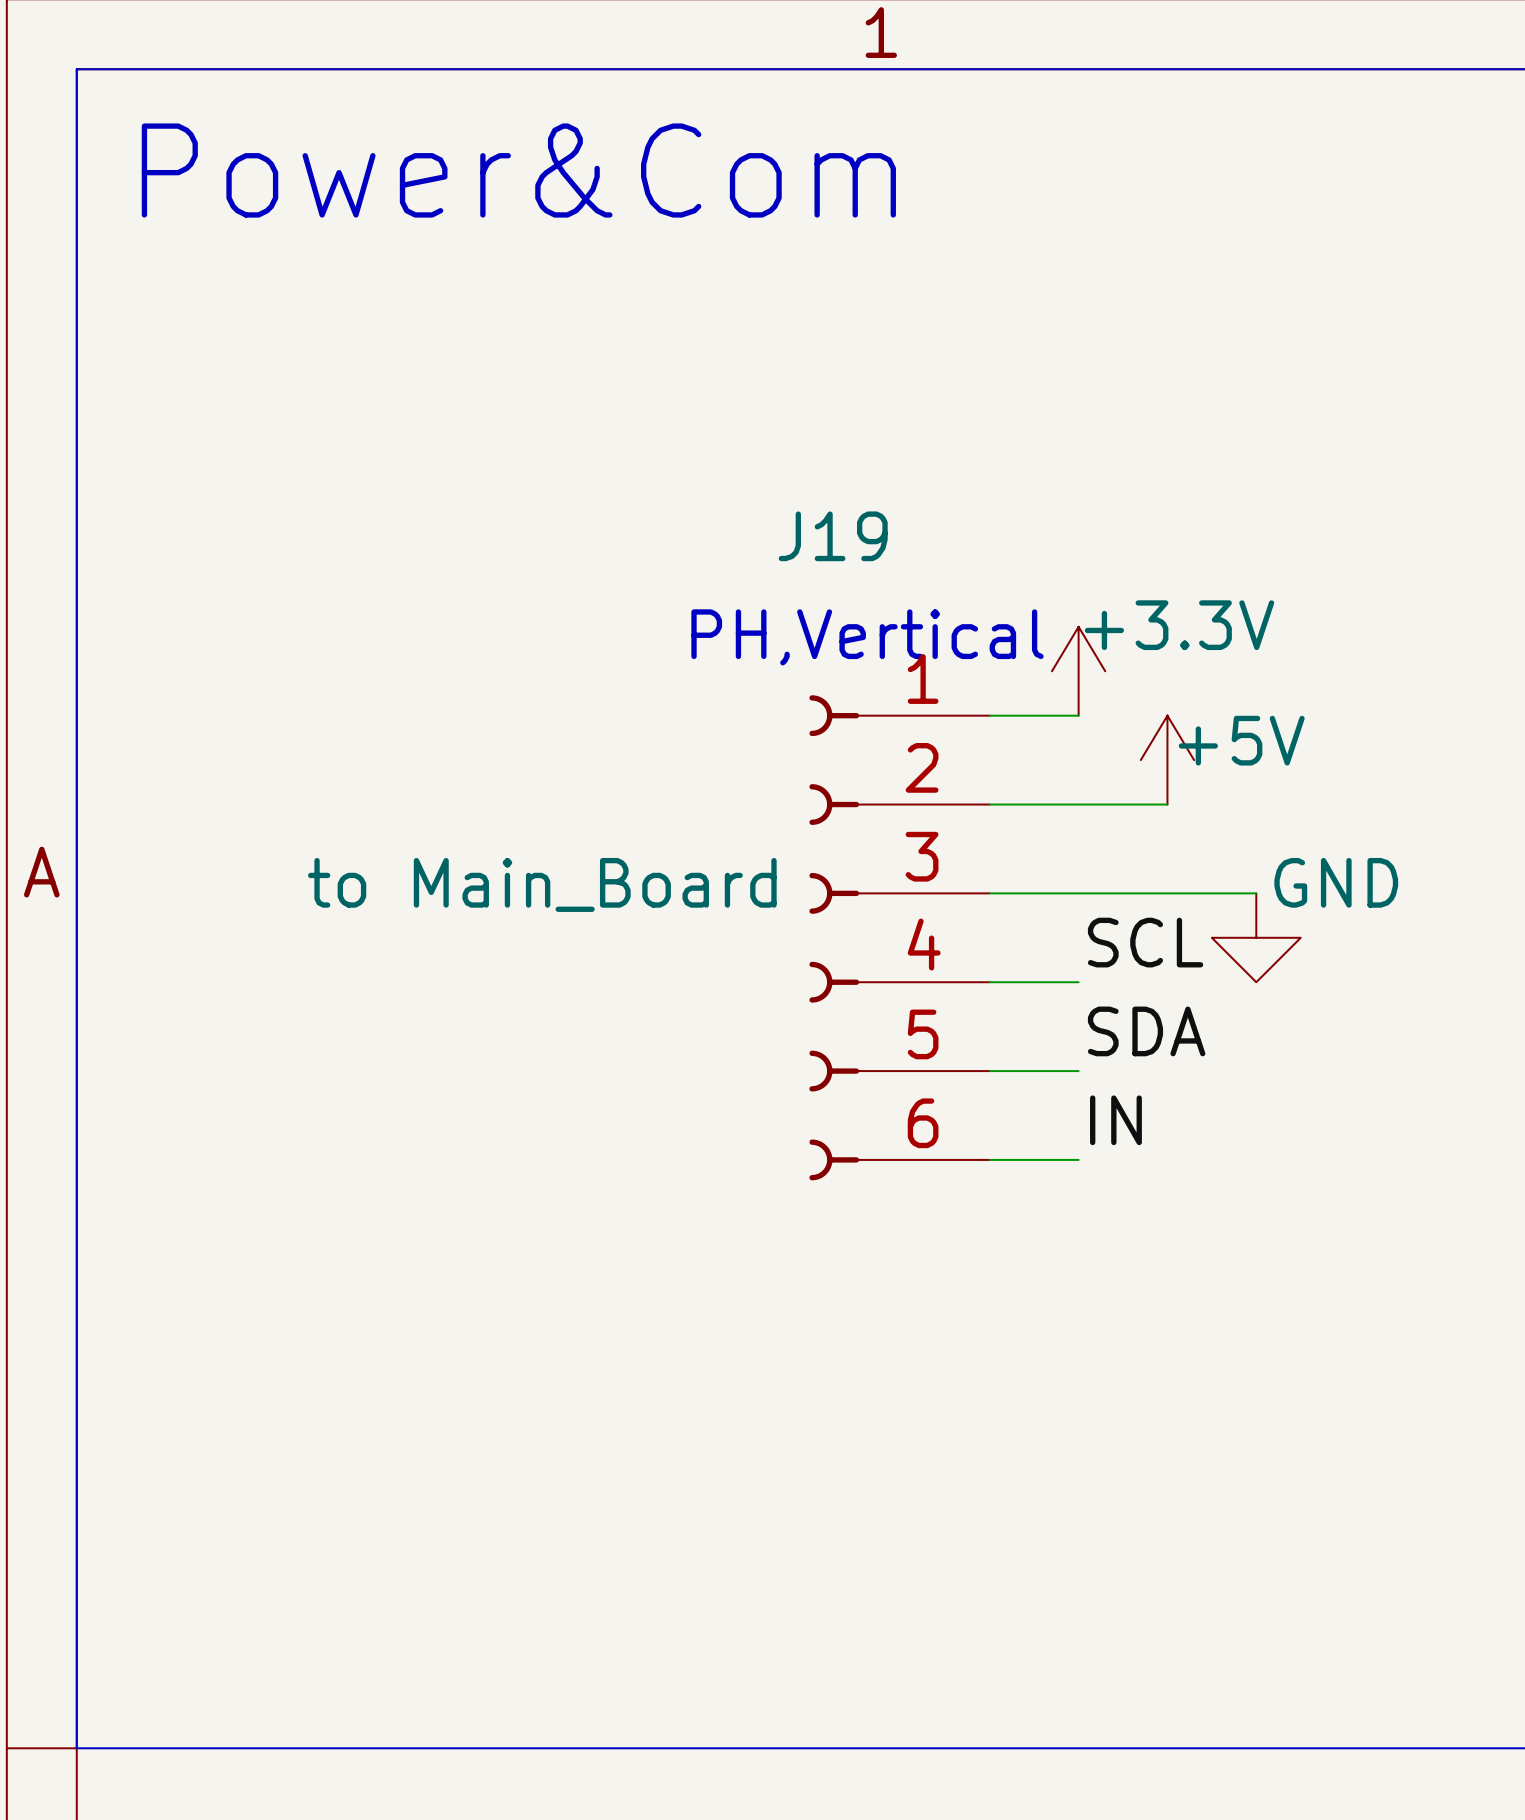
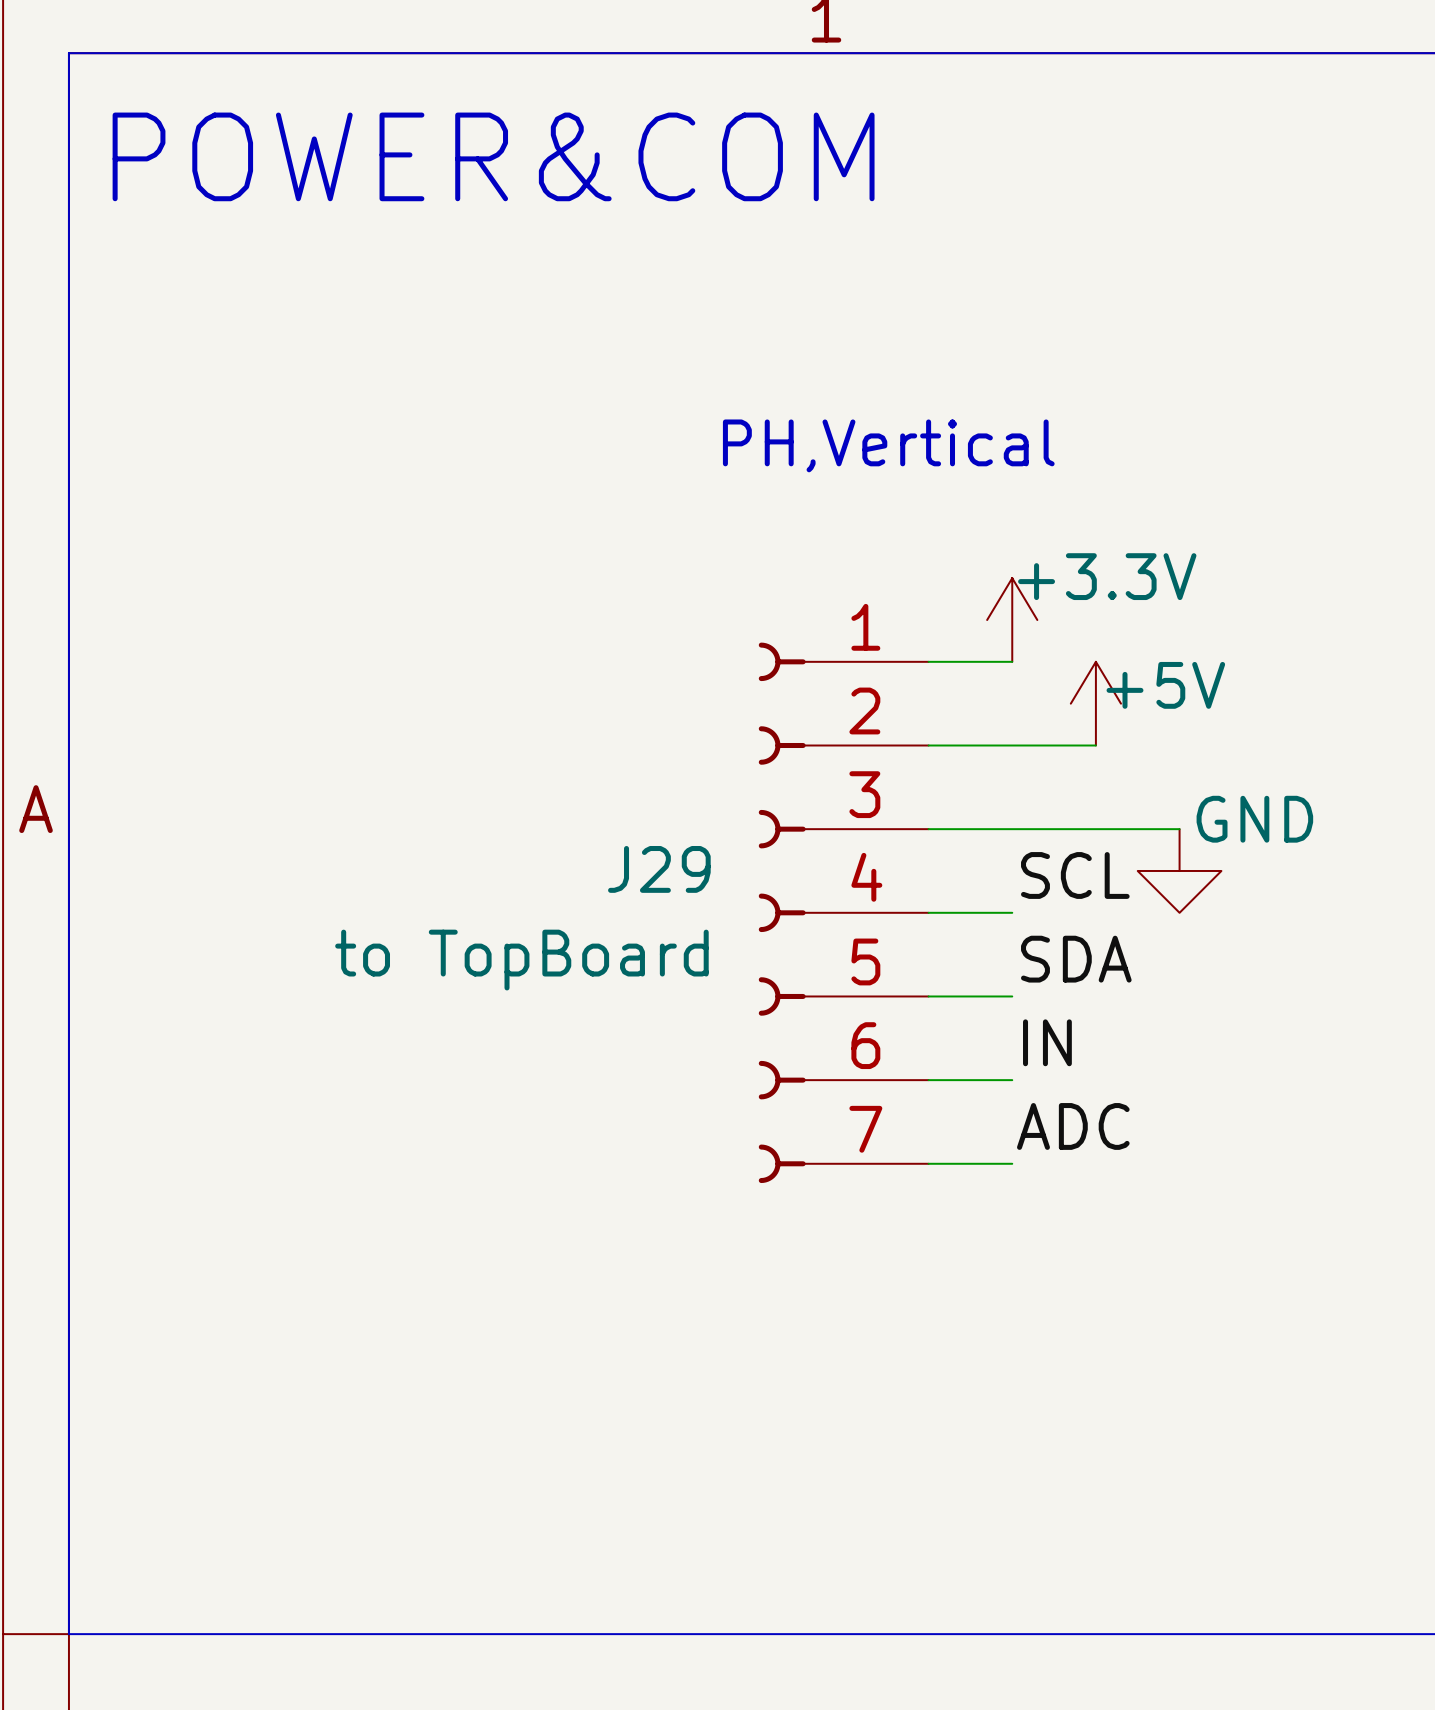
text: Power&Com (518, 170) -> POWER&COM (493, 156)
text position: PH,Vertical (867, 637) -> PH,Vertical (888, 445)
J19: to Main_Board (899, 937) -> none
J29: none -> to TopBoard (843, 912)
label: none -> ADC (1073, 1126)
wire: none -> (928, 1163) (1012, 1163)

